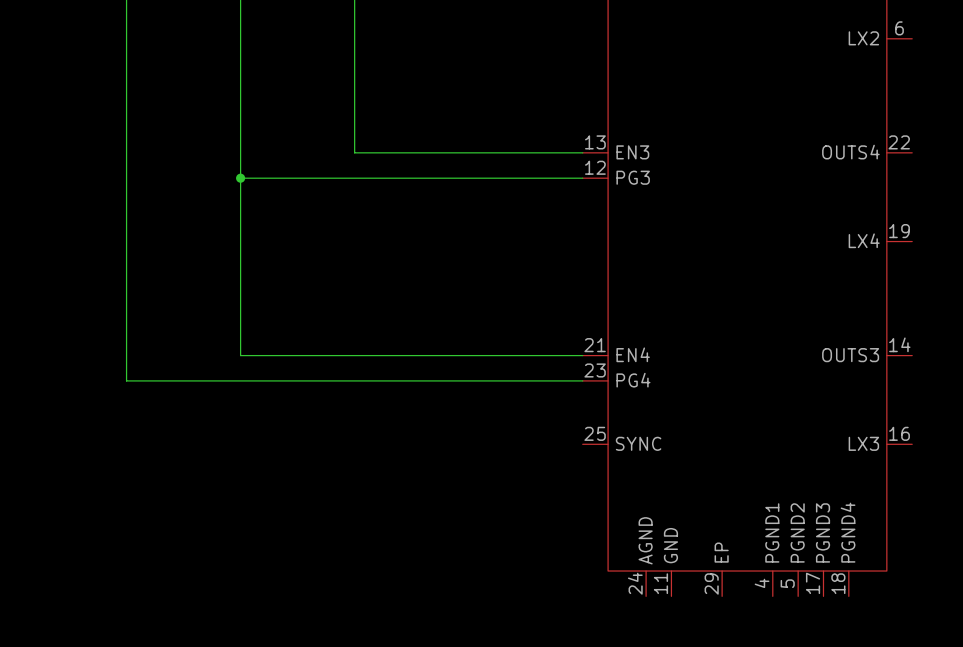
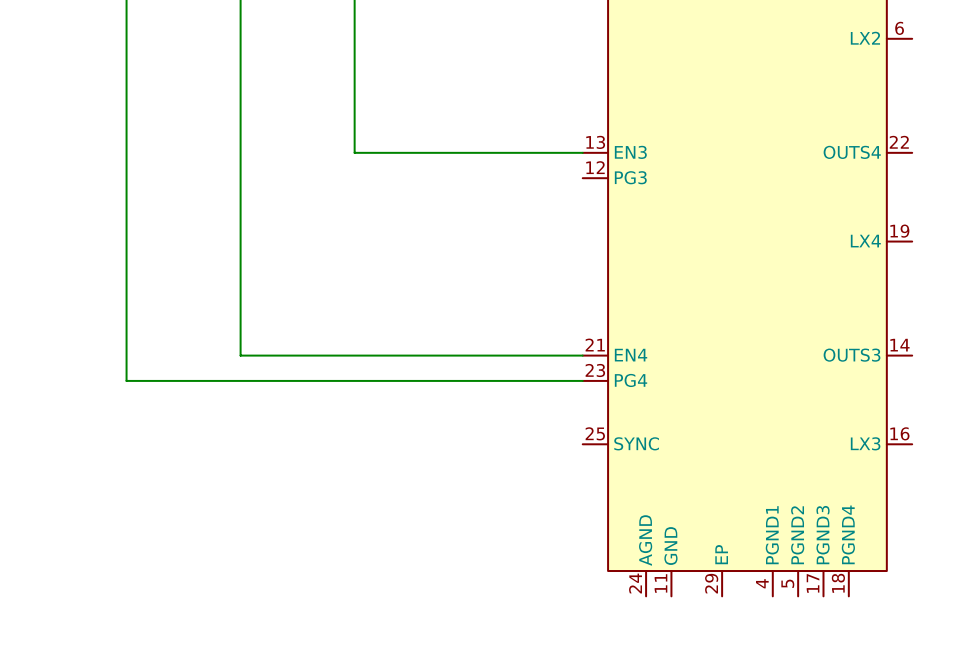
wire: (240, 178) (582, 178) -> none
junction: (240, 178) -> none

